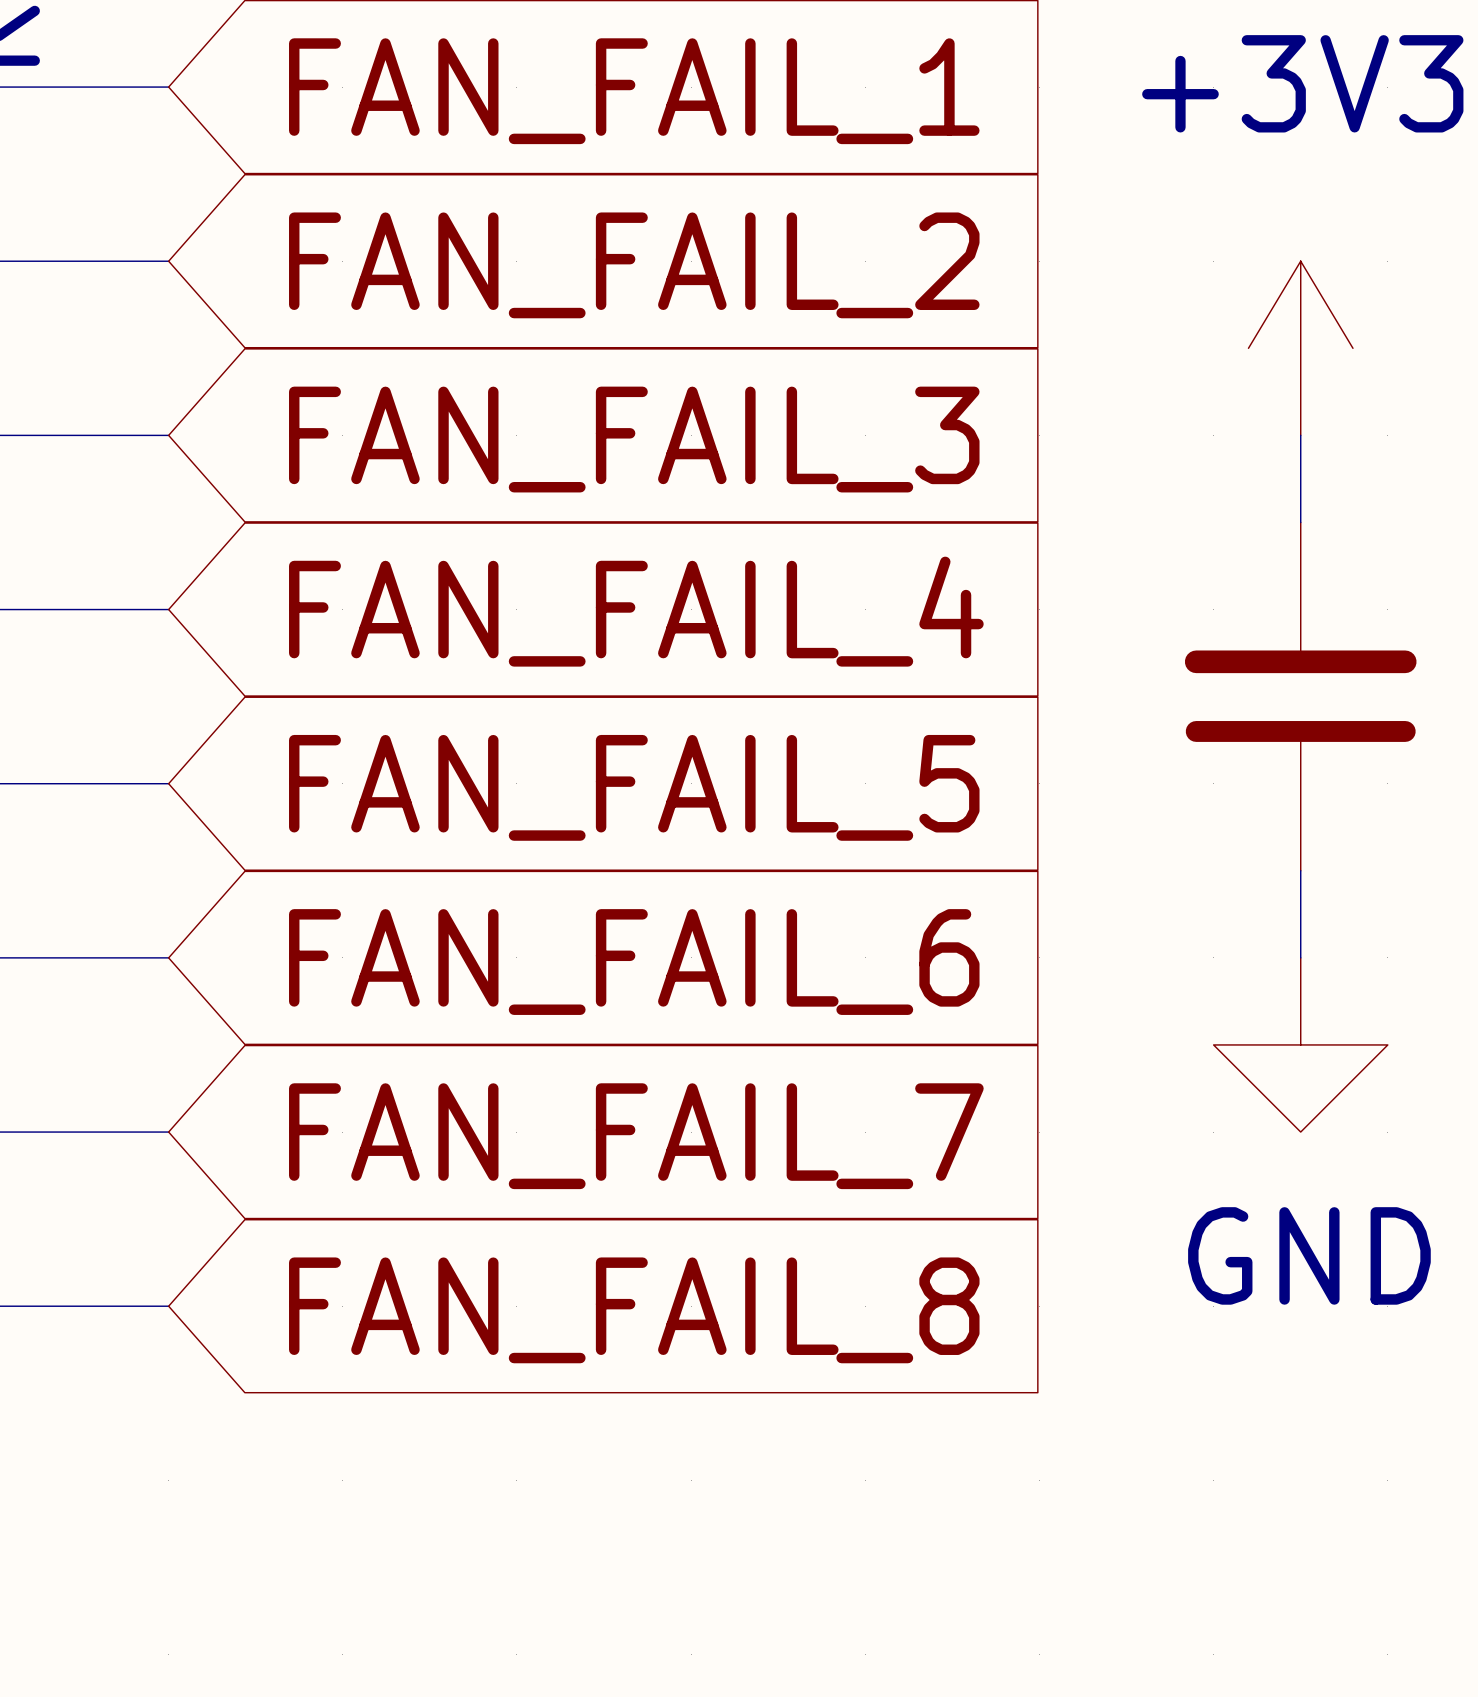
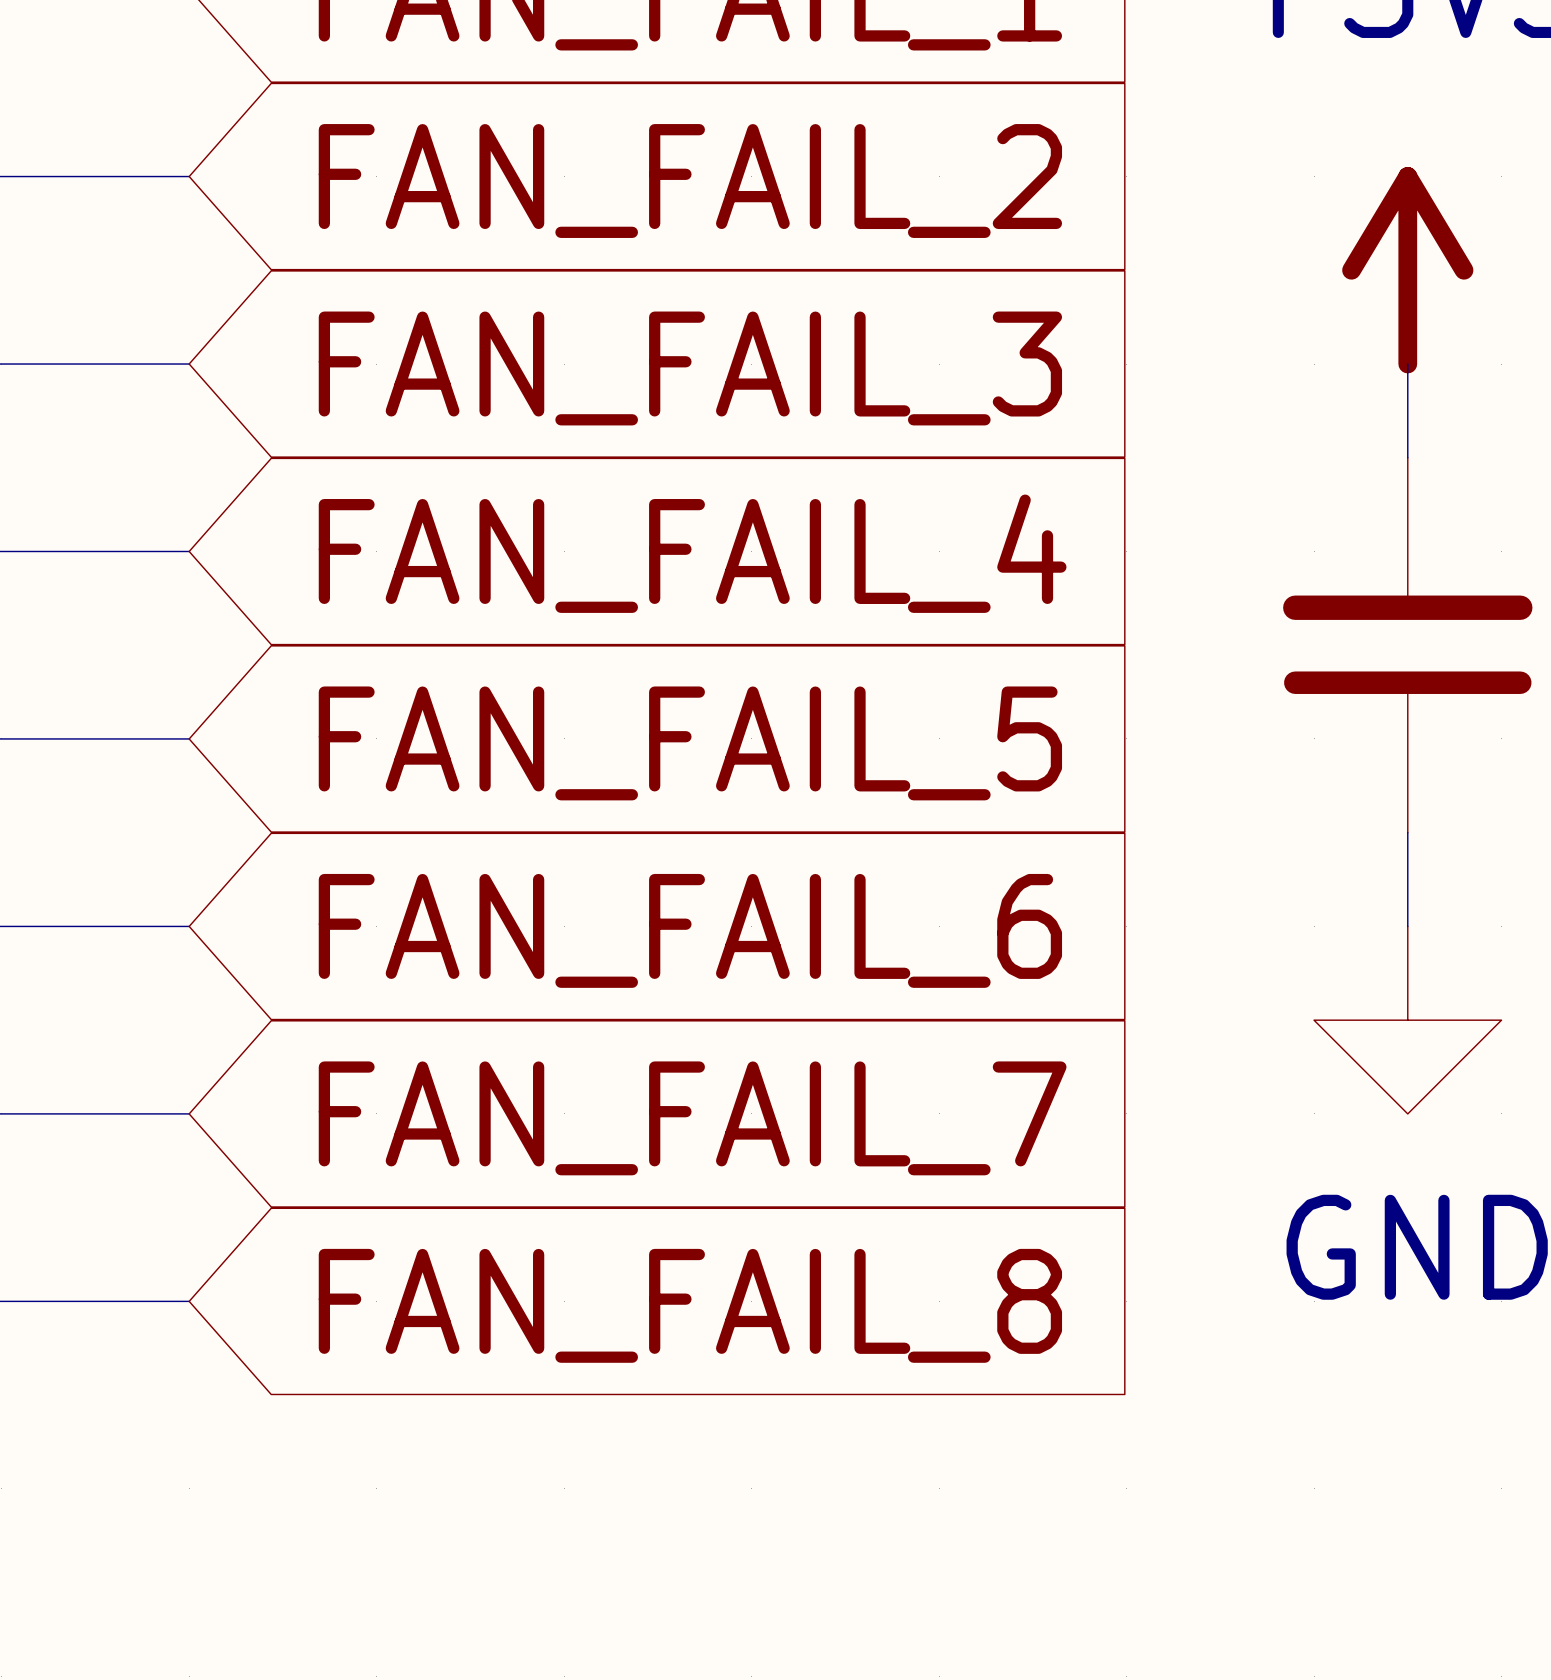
power symbol shape: [1248, 261, 1353, 436] -> [1342, 167, 1474, 374]

